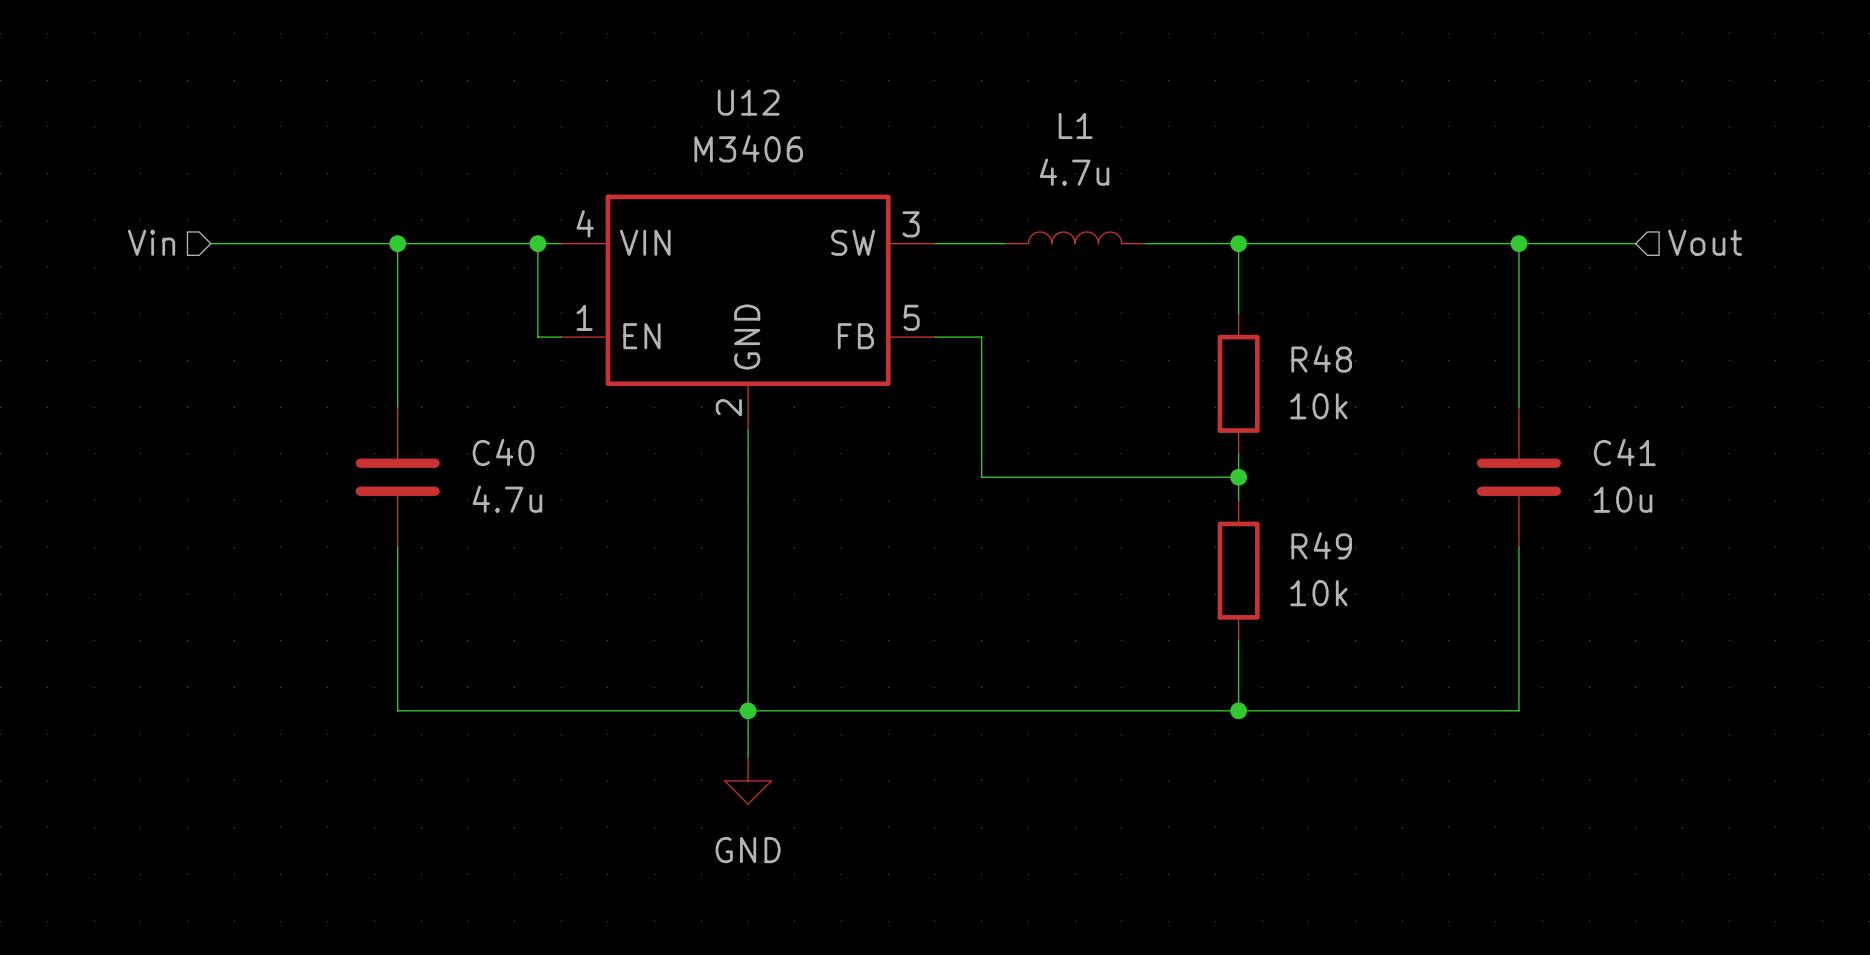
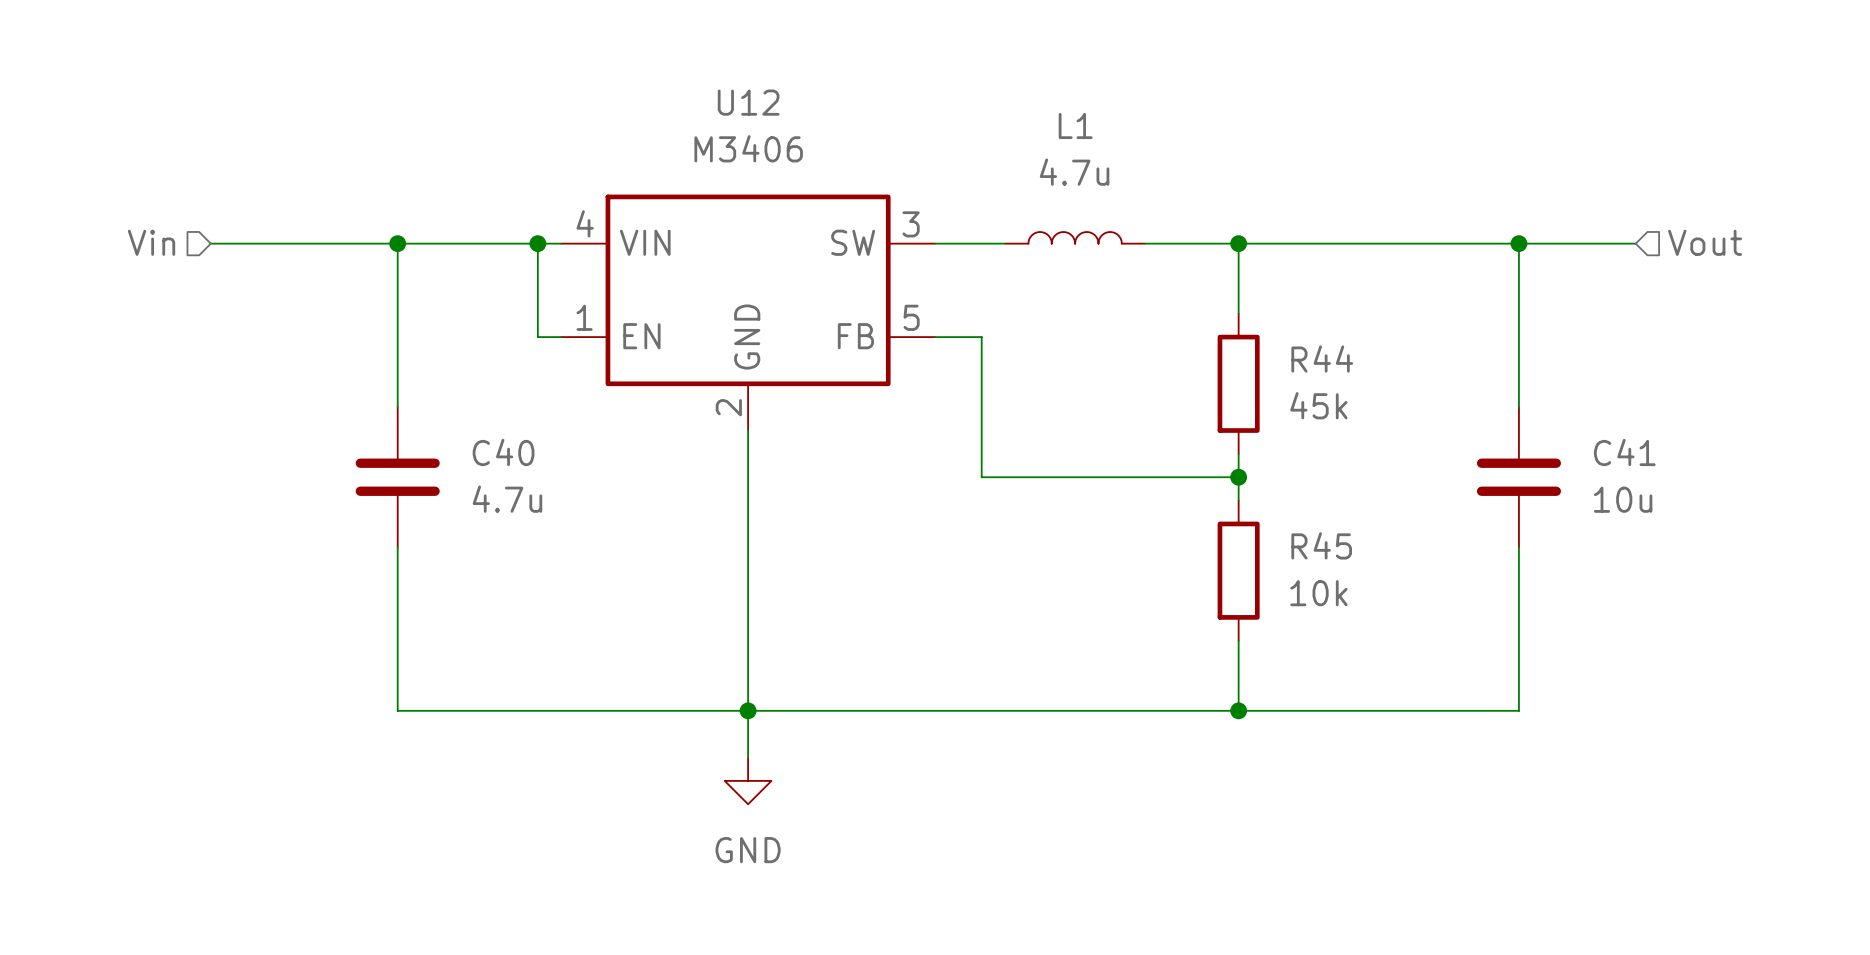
R48 name: R48 (1321, 359) -> R44 (1322, 359)
R48 value: 10k (1318, 406) -> 45k (1318, 405)
R49 name: R49 (1321, 545) -> R45 (1321, 545)

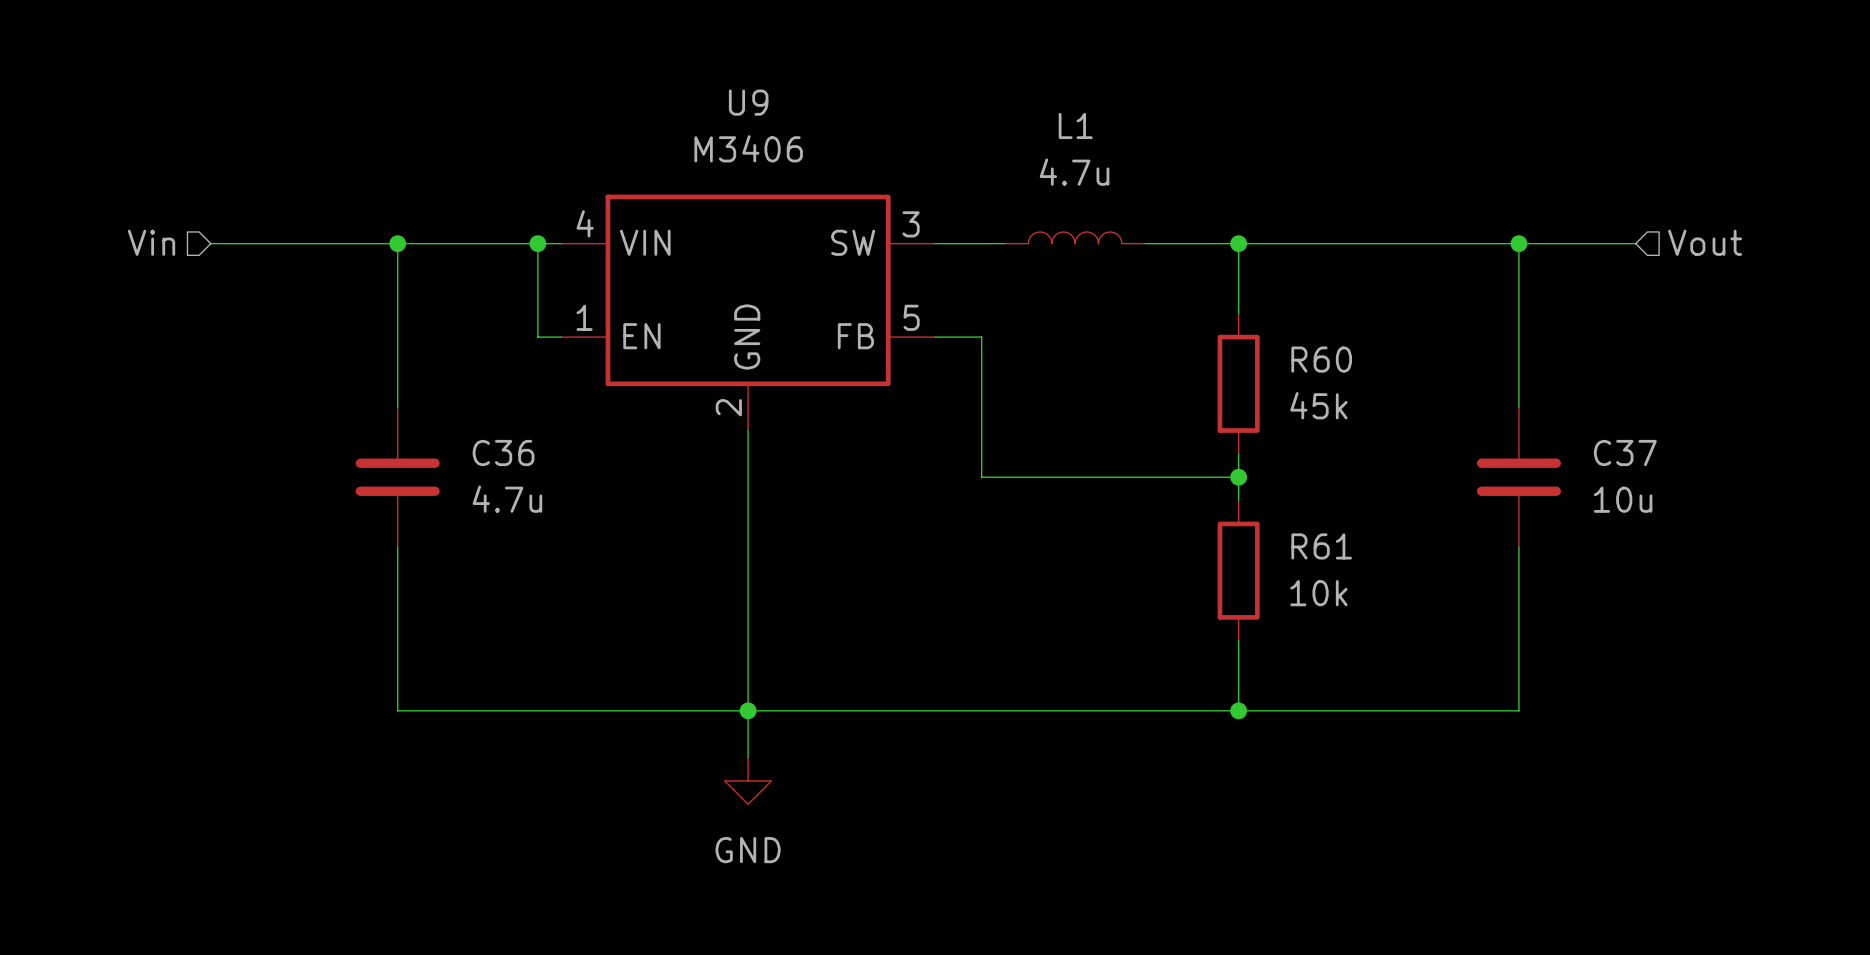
U12 name: U12 (748, 102) -> U9 (748, 102)
R44 name: R44 (1322, 359) -> R60 (1321, 359)
C40 name: C40 (503, 452) -> C36 (503, 453)
C41 name: C41 (1624, 452) -> C37 (1625, 453)
R45 name: R45 (1321, 545) -> R61 (1321, 546)

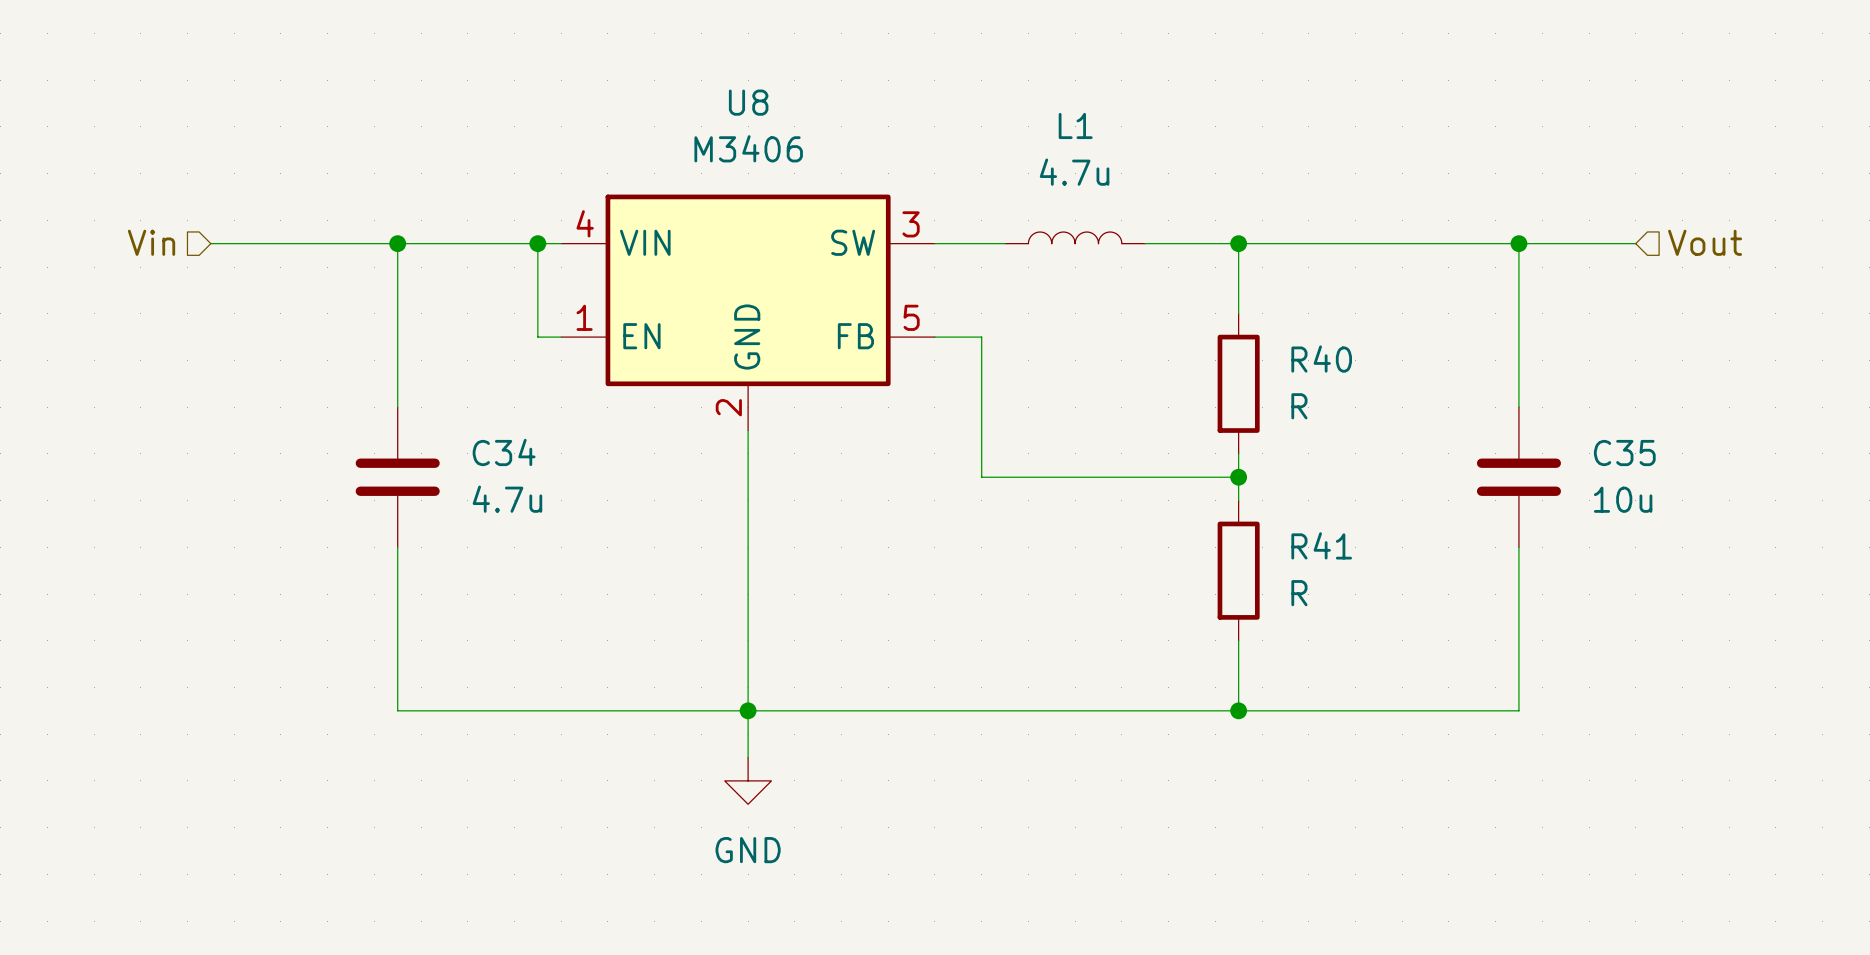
U9 name: U9 (748, 102) -> U8 (748, 102)
R60 name: R60 (1321, 359) -> R40 (1321, 359)
R60 value: 45k (1318, 405) -> R (1299, 406)
C36 name: C36 (503, 453) -> C34 (504, 452)
C37 name: C37 (1625, 453) -> C35 (1624, 453)
R61 name: R61 (1321, 546) -> R41 (1321, 545)
R61 value: 10k (1318, 593) -> R (1299, 593)

